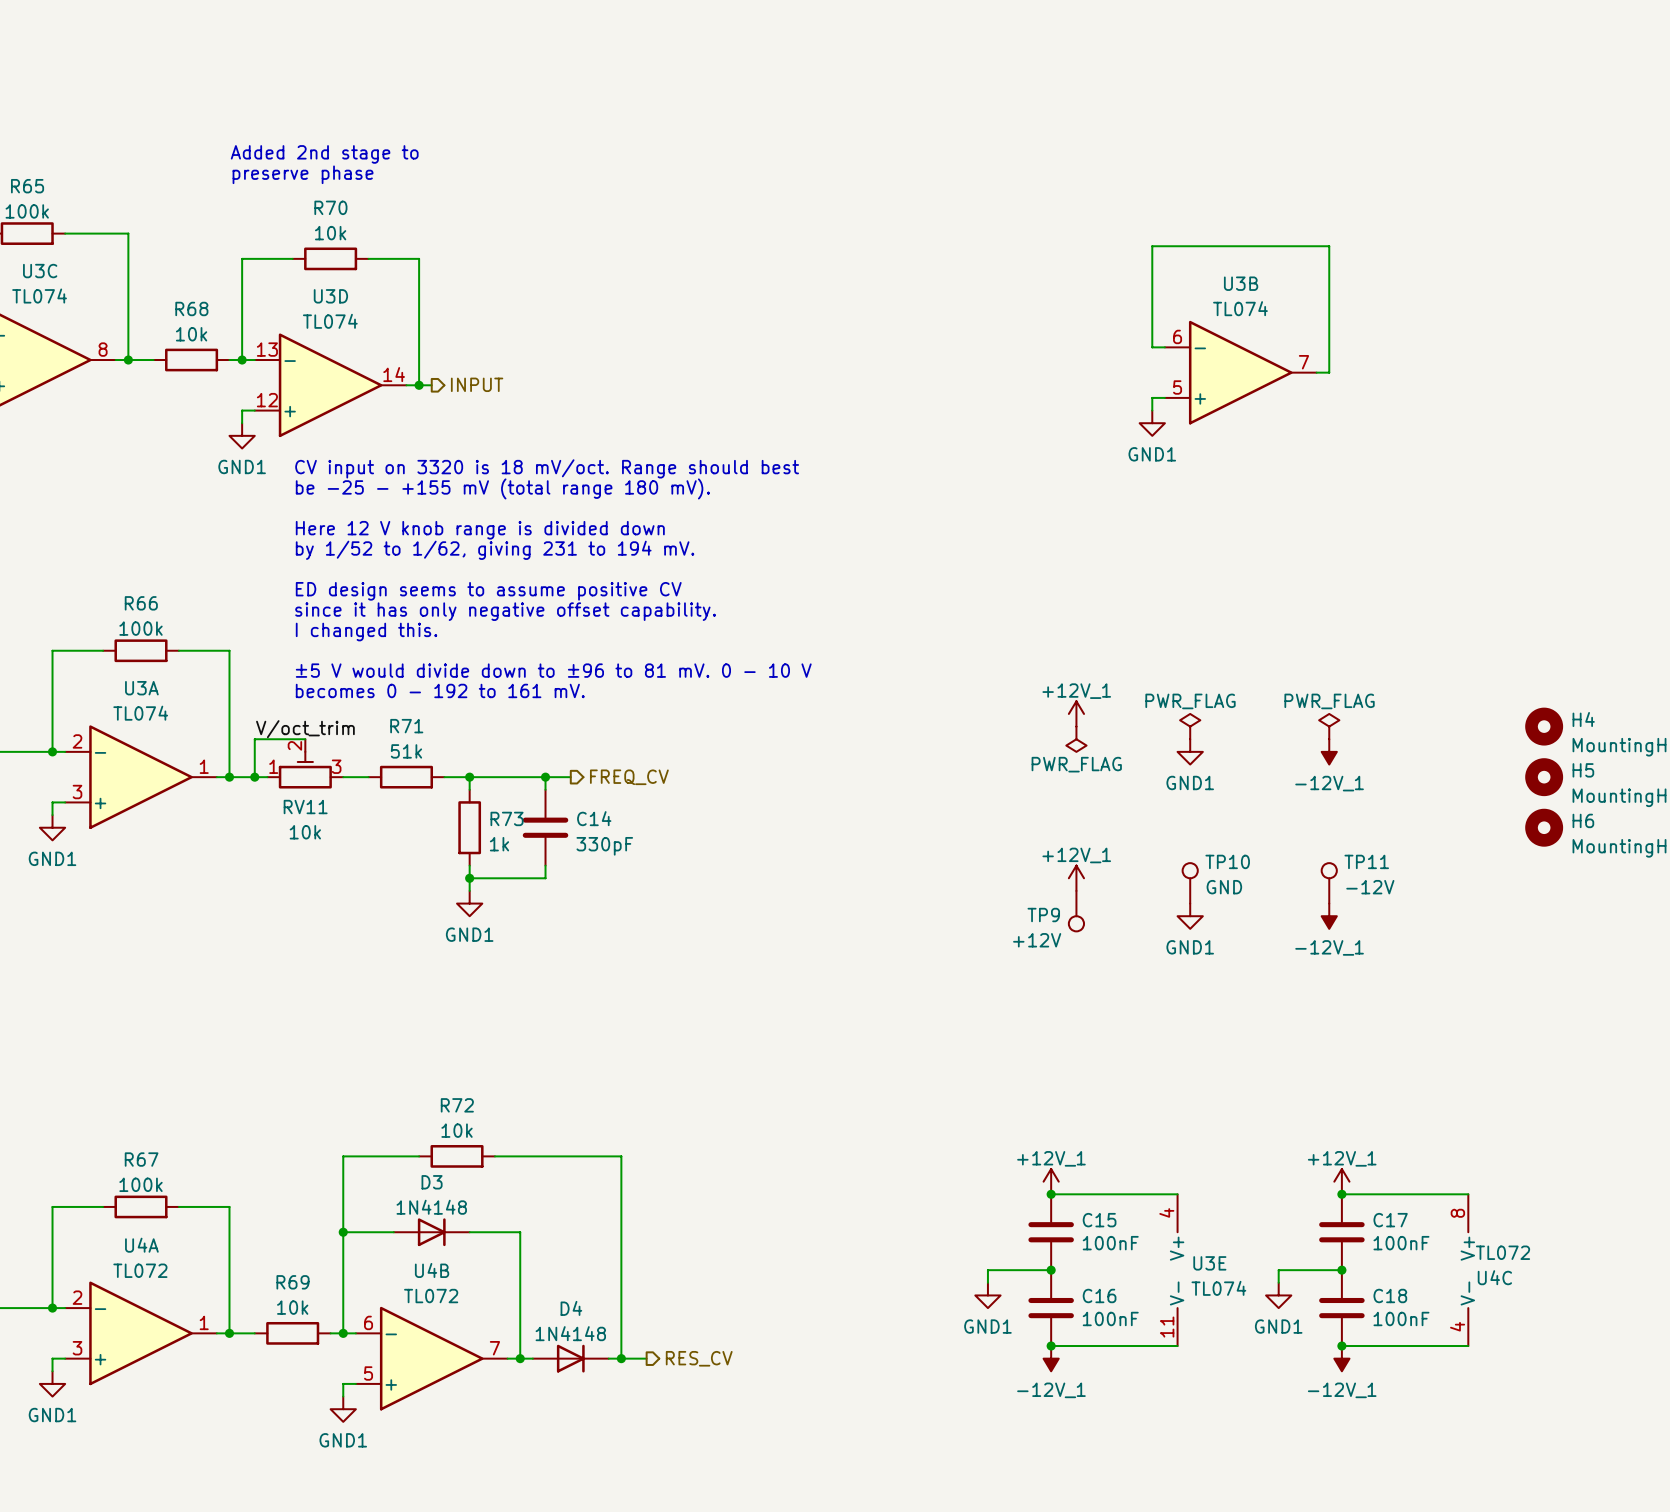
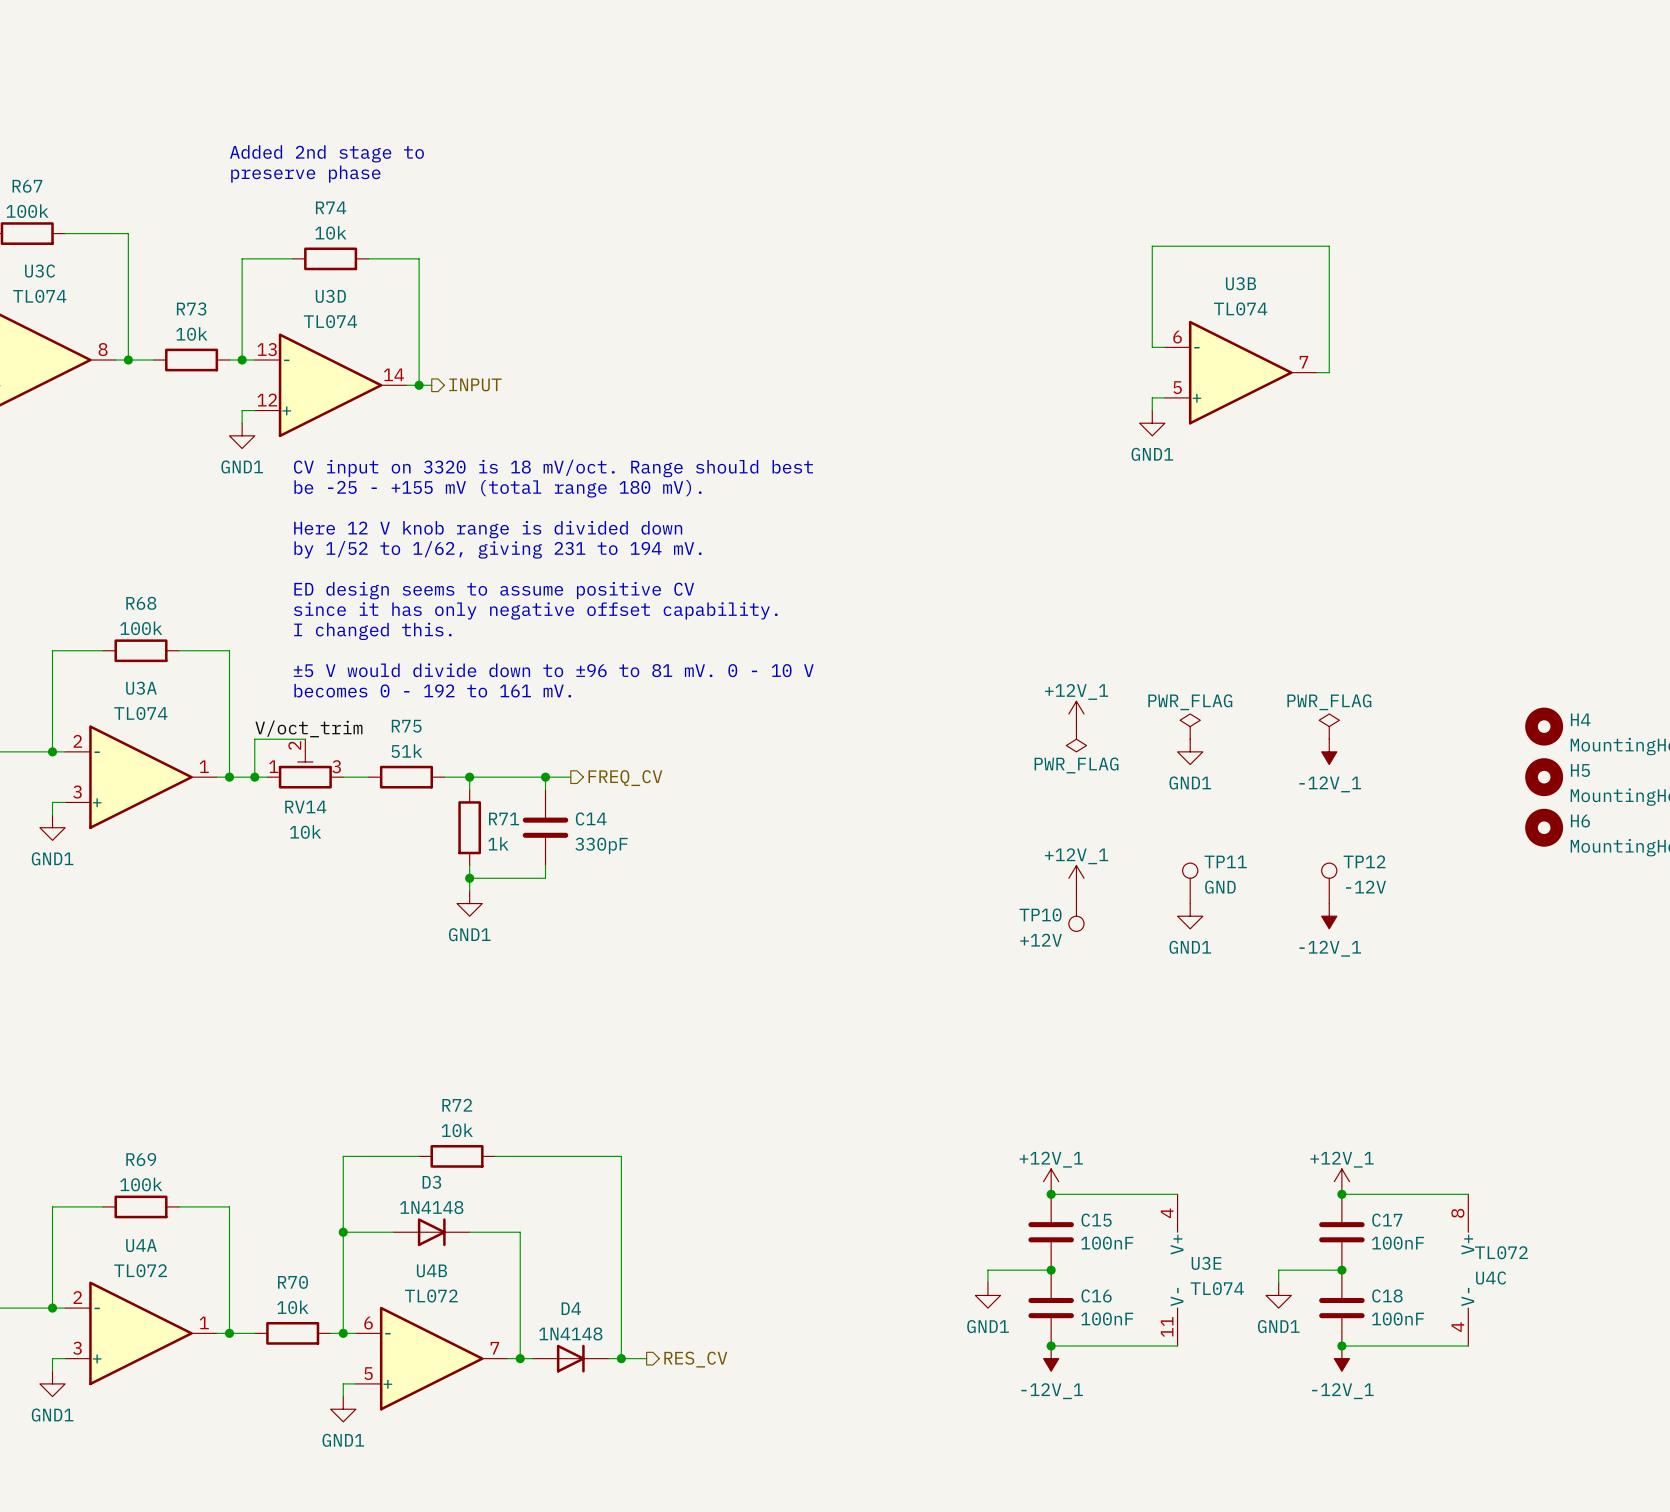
R65 name: R65 (27, 186) -> R67 (27, 186)
R70 name: R70 (330, 207) -> R74 (331, 207)
R68 name: R68 (191, 308) -> R73 (191, 308)
R66 name: R66 (141, 603) -> R68 (141, 603)
R71 name: R71 (406, 726) -> R75 (406, 726)
RV11 name: RV11 (305, 807) -> RV14 (305, 807)
R73 name: R73 (507, 818) -> R71 (504, 818)
TP10 name: TP10 (1227, 861) -> TP11 (1225, 861)
TP11 name: TP11 (1366, 861) -> TP12 (1364, 861)
TP9 name: TP9 (1043, 915) -> TP10 (1040, 915)
R67 name: R67 (141, 1159) -> R69 (141, 1159)
R69 name: R69 (292, 1282) -> R70 (293, 1282)

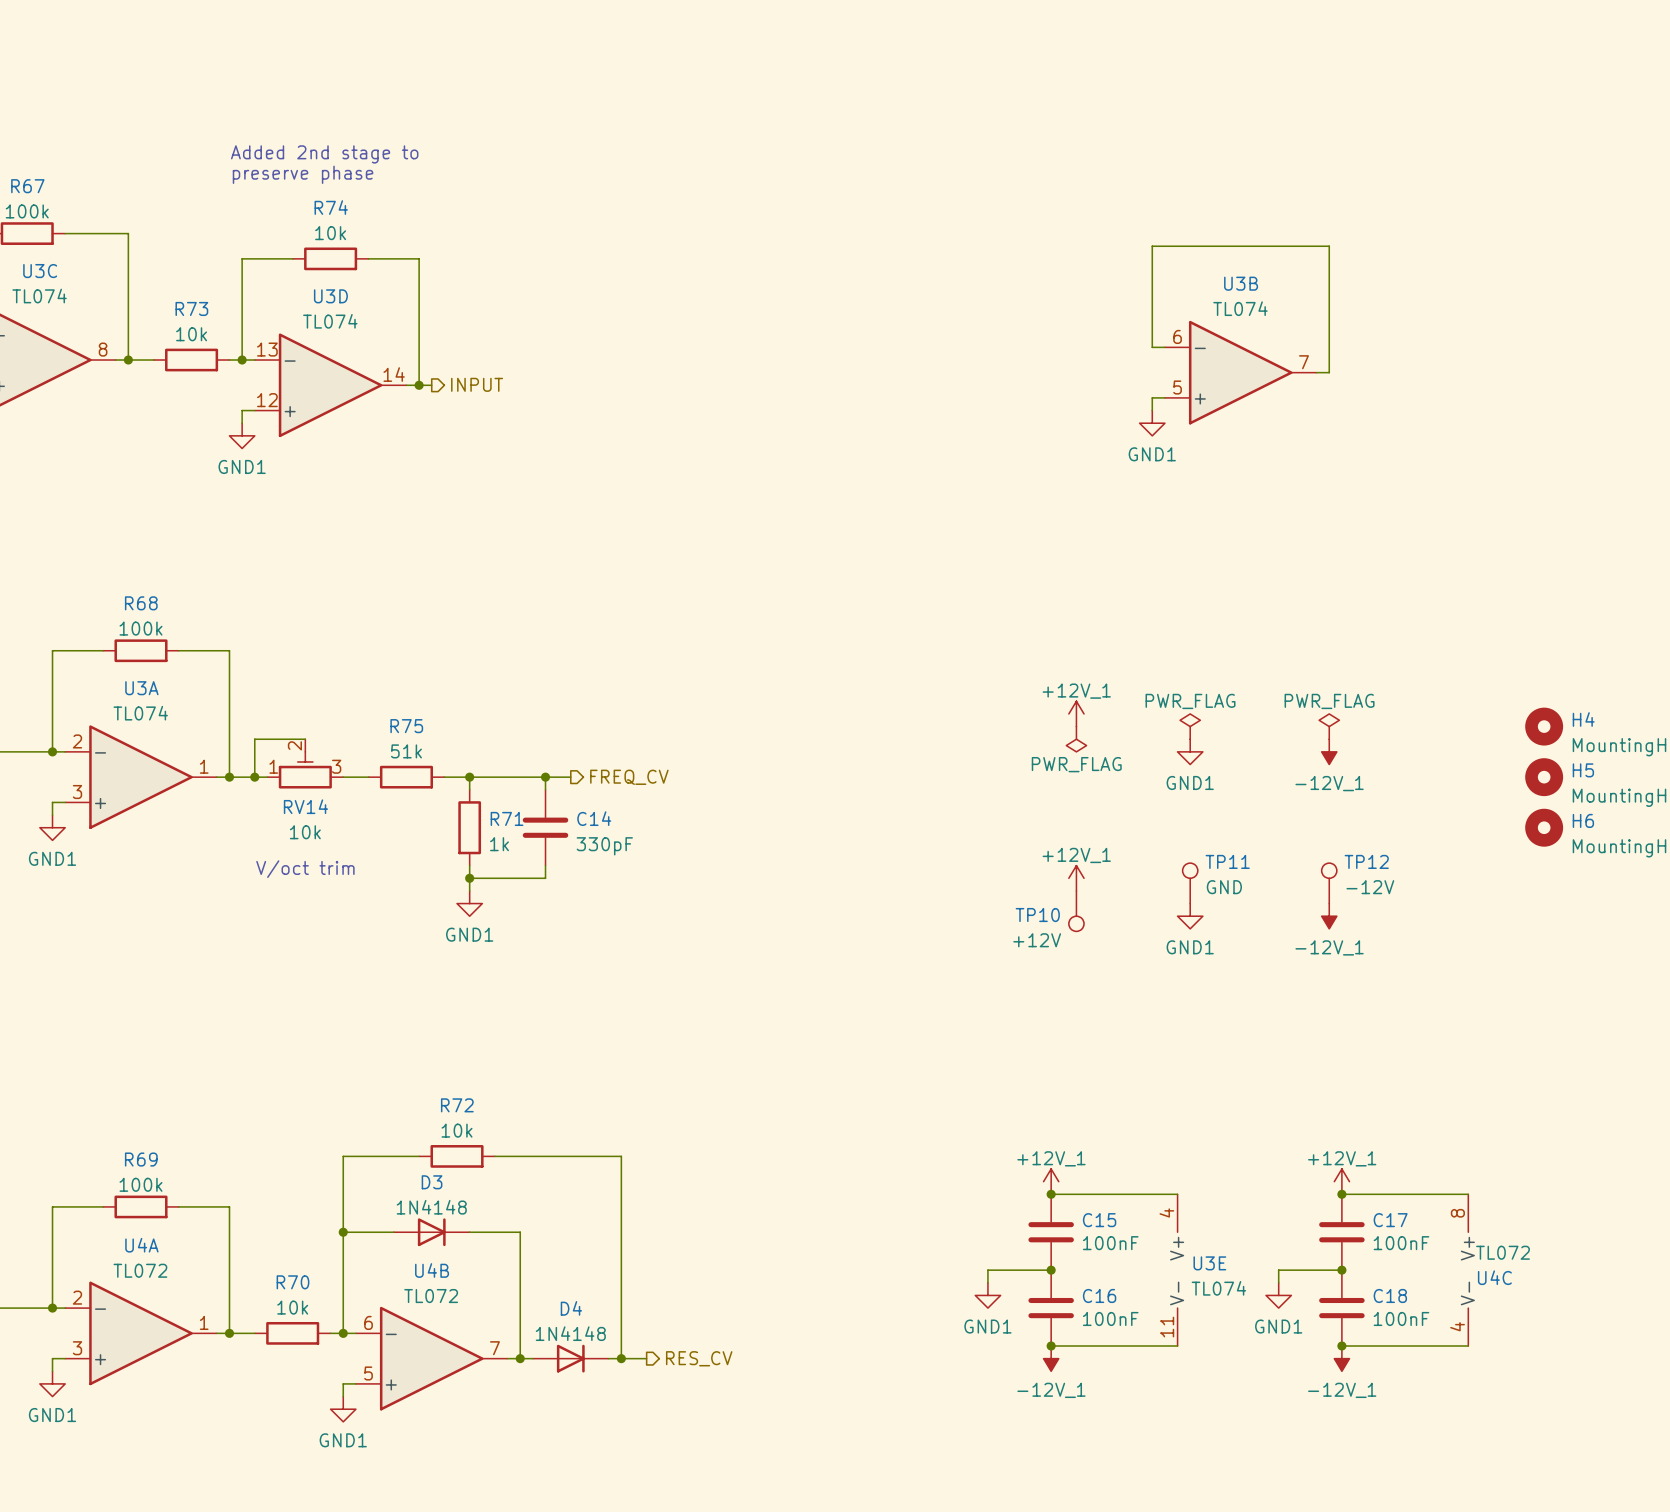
text: CV input on 3320 is 18 mV/oct. Range should best (553, 468) -> none
text: be -25 - +155 mV (total range 180 mV). (497, 488) -> none
text: Here 12 V knob range is divided down (488, 529) -> none
text: by 1/52 to 1/62, giving 231 to 194 mV. (497, 549) -> none
text: ED design seems to assume positive CV (494, 590) -> none
text: since it has only negative offset capability. (535, 611) -> none
text: I changed this. (372, 631) -> none
text: ±5 V would divide down to ±96 to 81 mV. 0 - 10 V (553, 670) -> none
text: becomes 0 - 192 to 161 mV. (432, 690) -> none
label: V/oct_trim (308, 728) -> none
text: none -> V/oct trim (305, 869)

